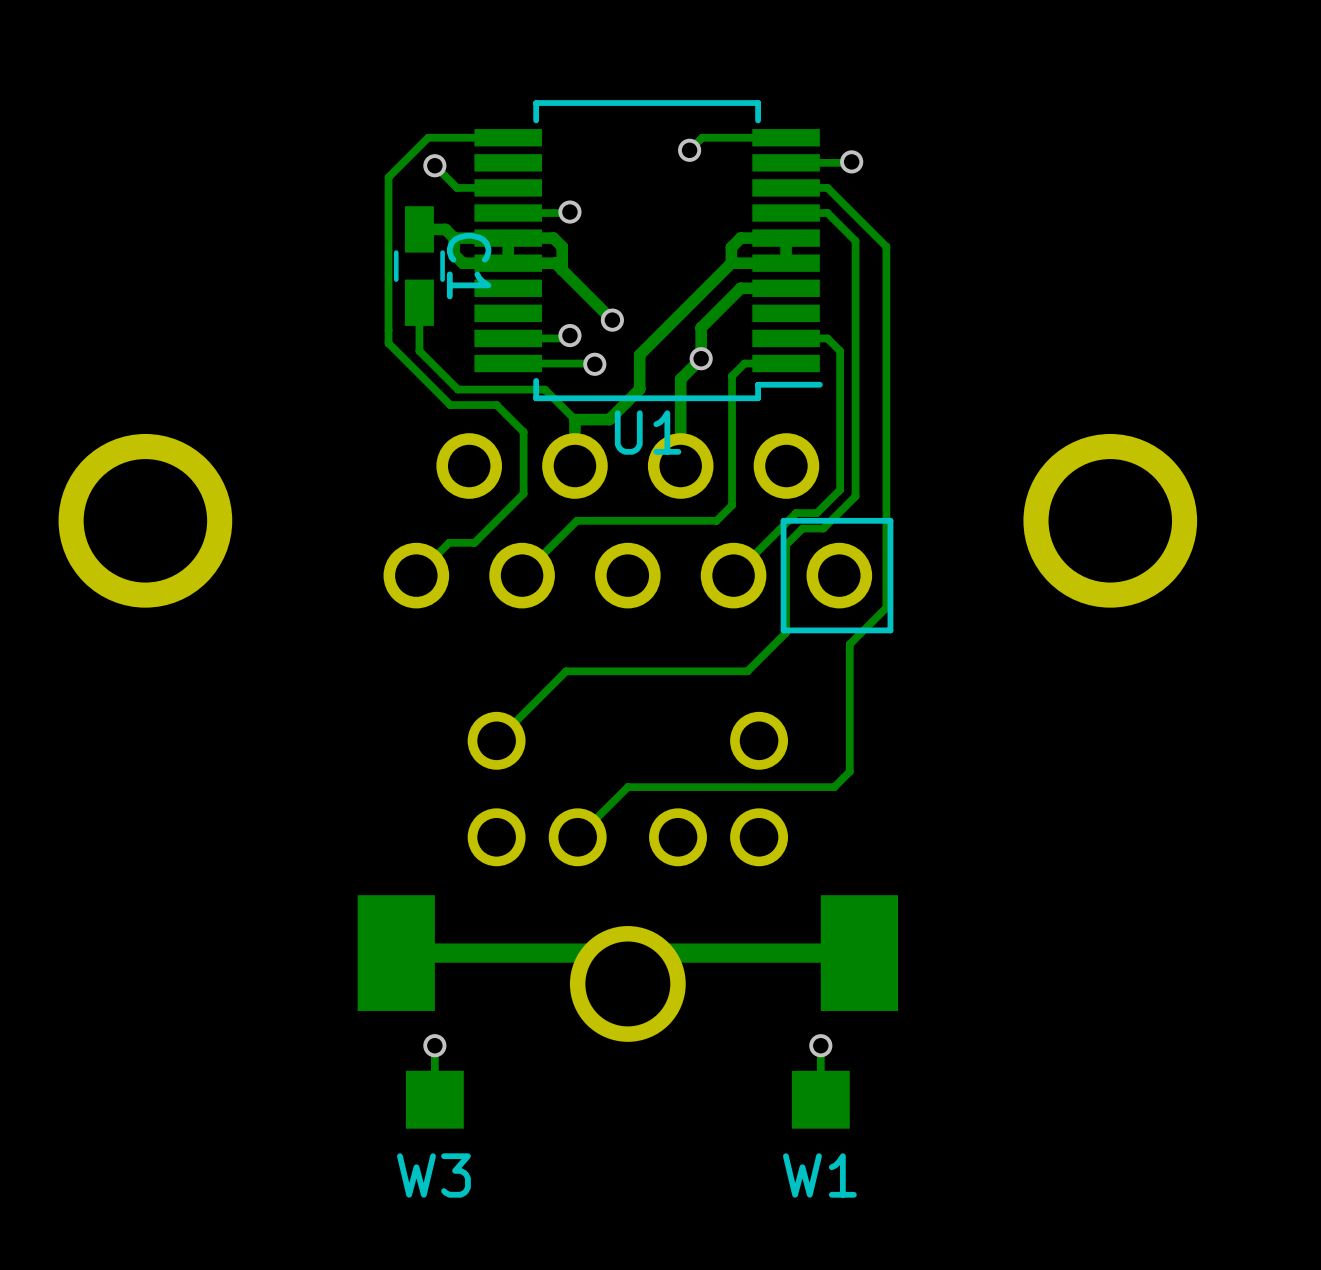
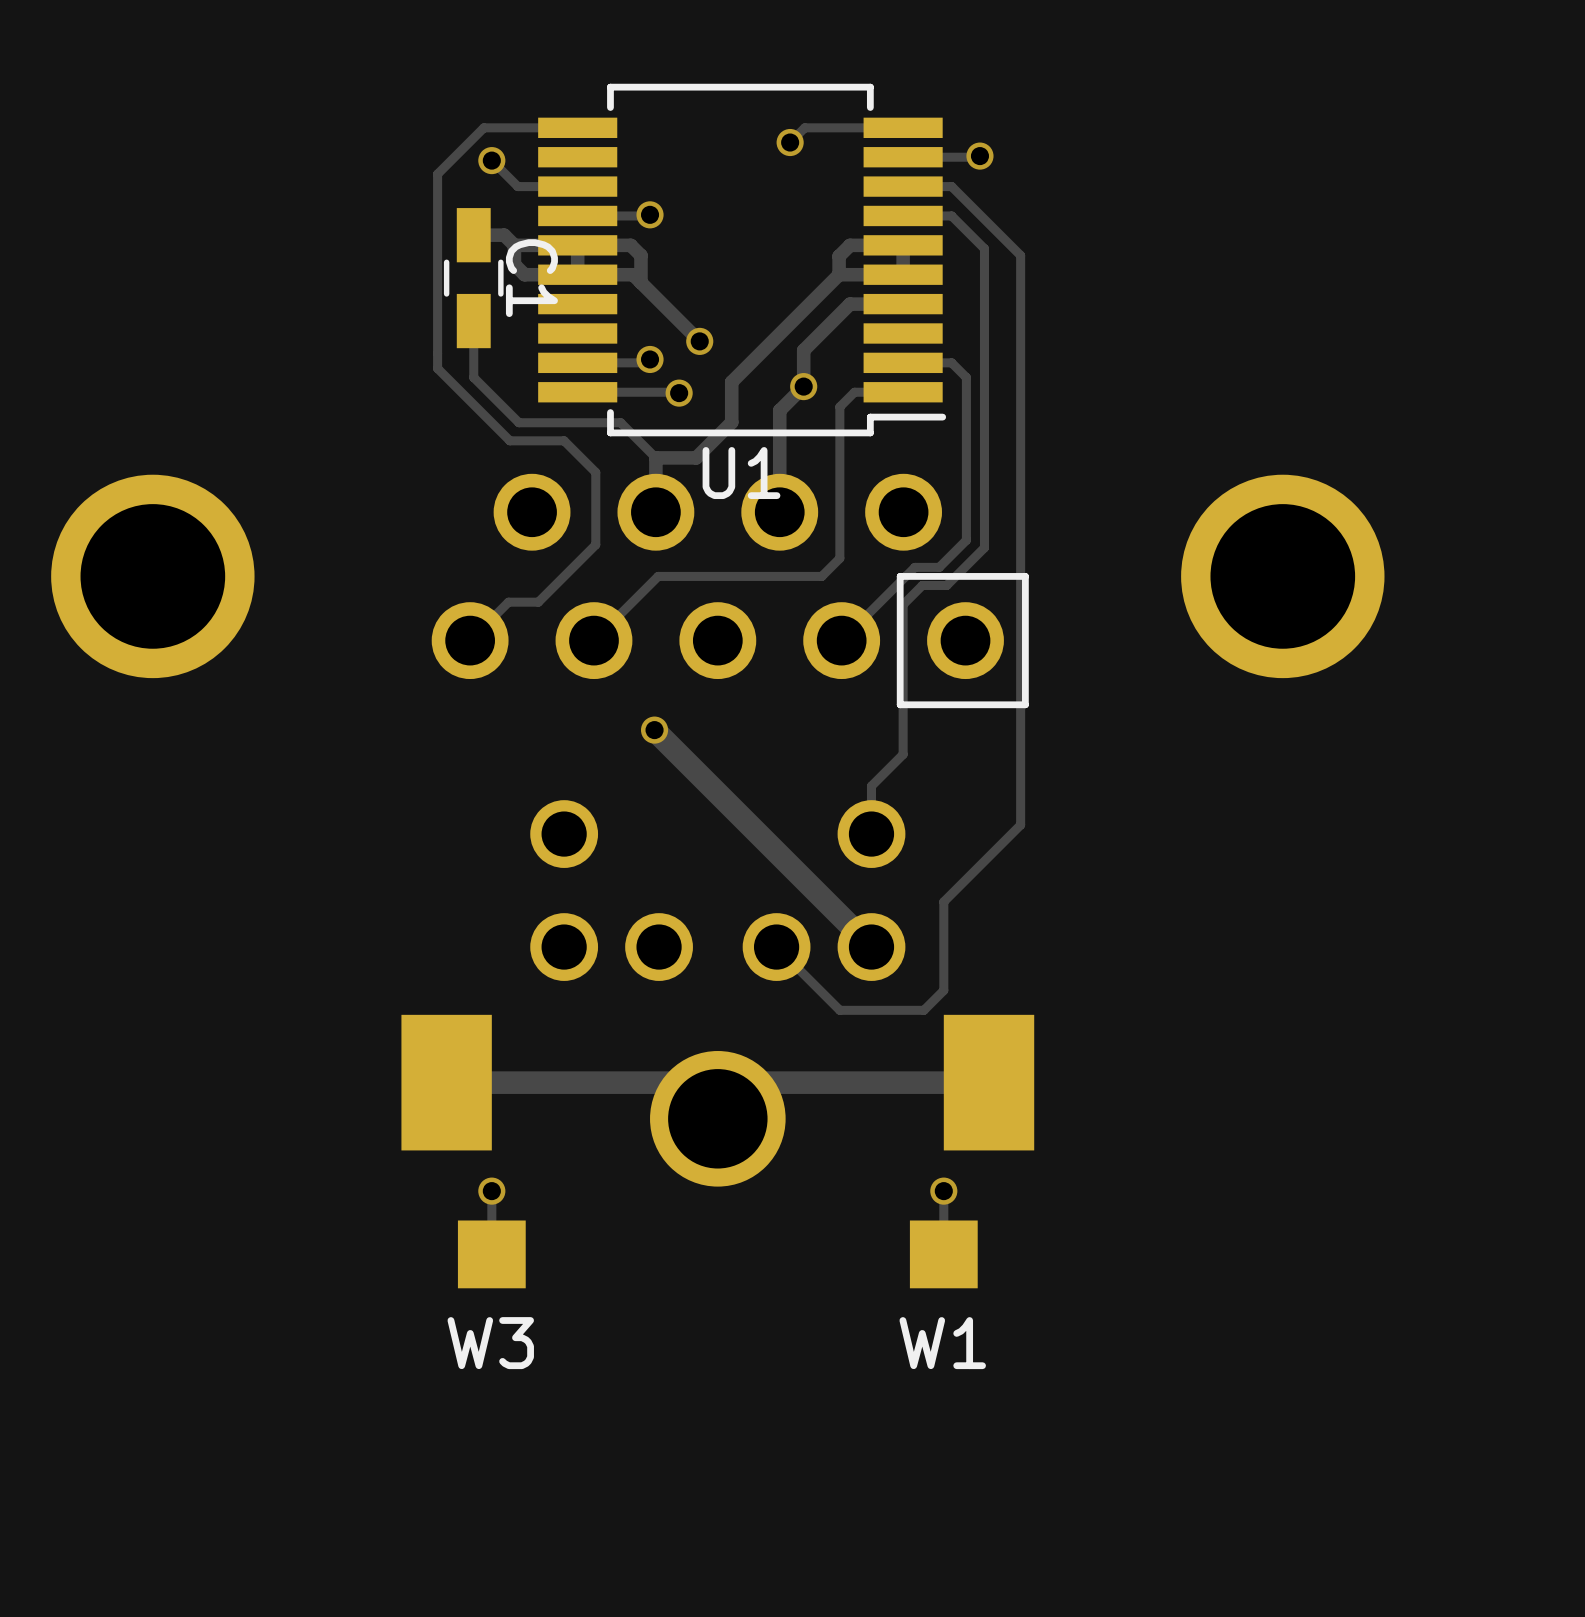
track: (886, 607) (849, 644) (849, 771) (834, 787) (627, 787) (577, 837) -> (1020, 678) (1020, 825) (943, 901) (943, 990) (923, 1010) (839, 1010) (776, 947)
track: (786, 632) (747, 671) (566, 671) (496, 740) -> (903, 707) (903, 754) (871, 786) (871, 834)
track: none -> (654, 730) (871, 947)
via: none -> (654, 730)

